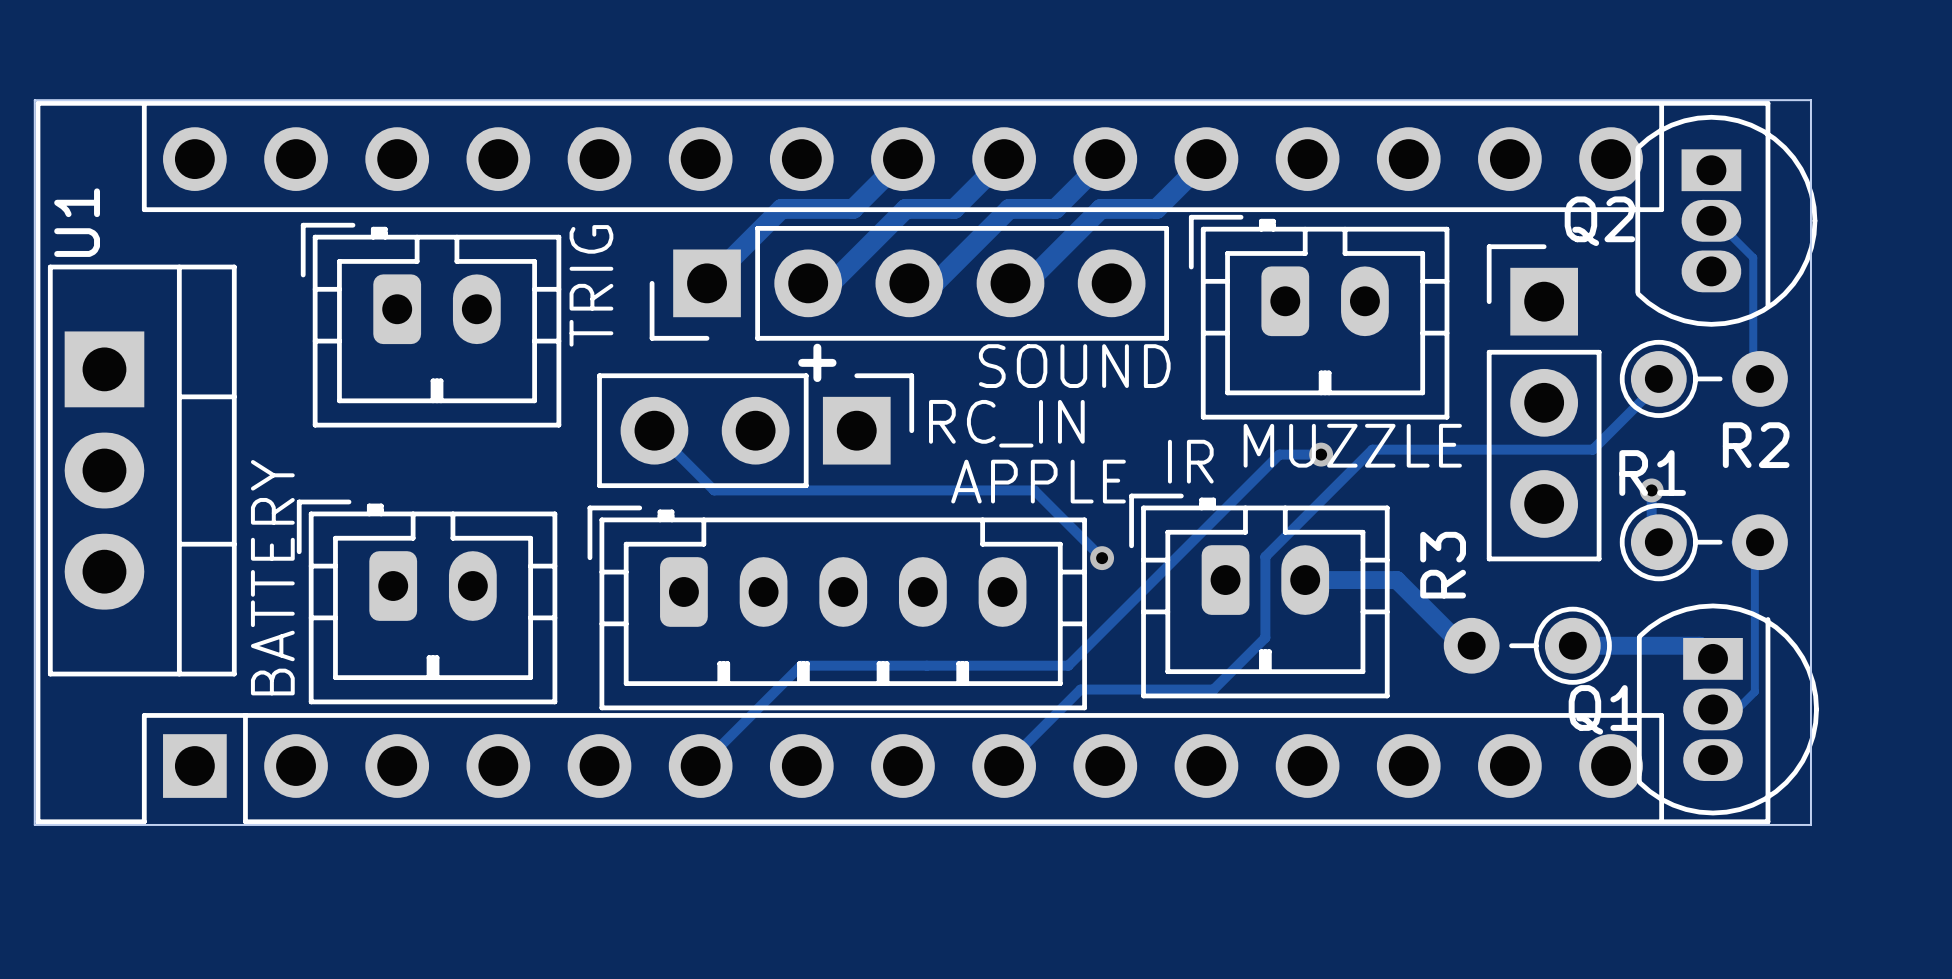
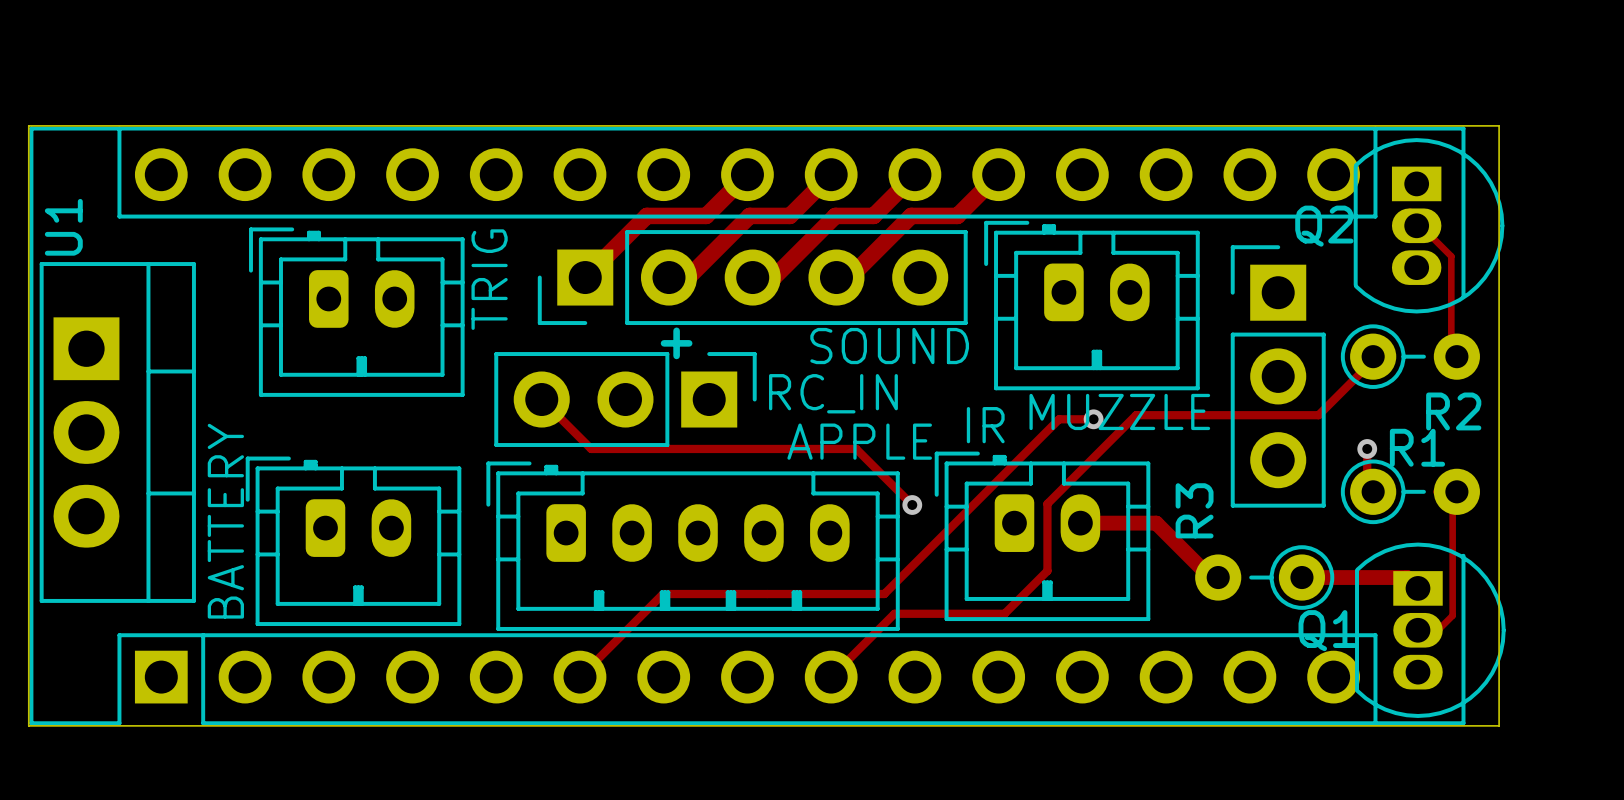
R1 name position: R1 (1652, 473) -> R1 (1417, 447)

